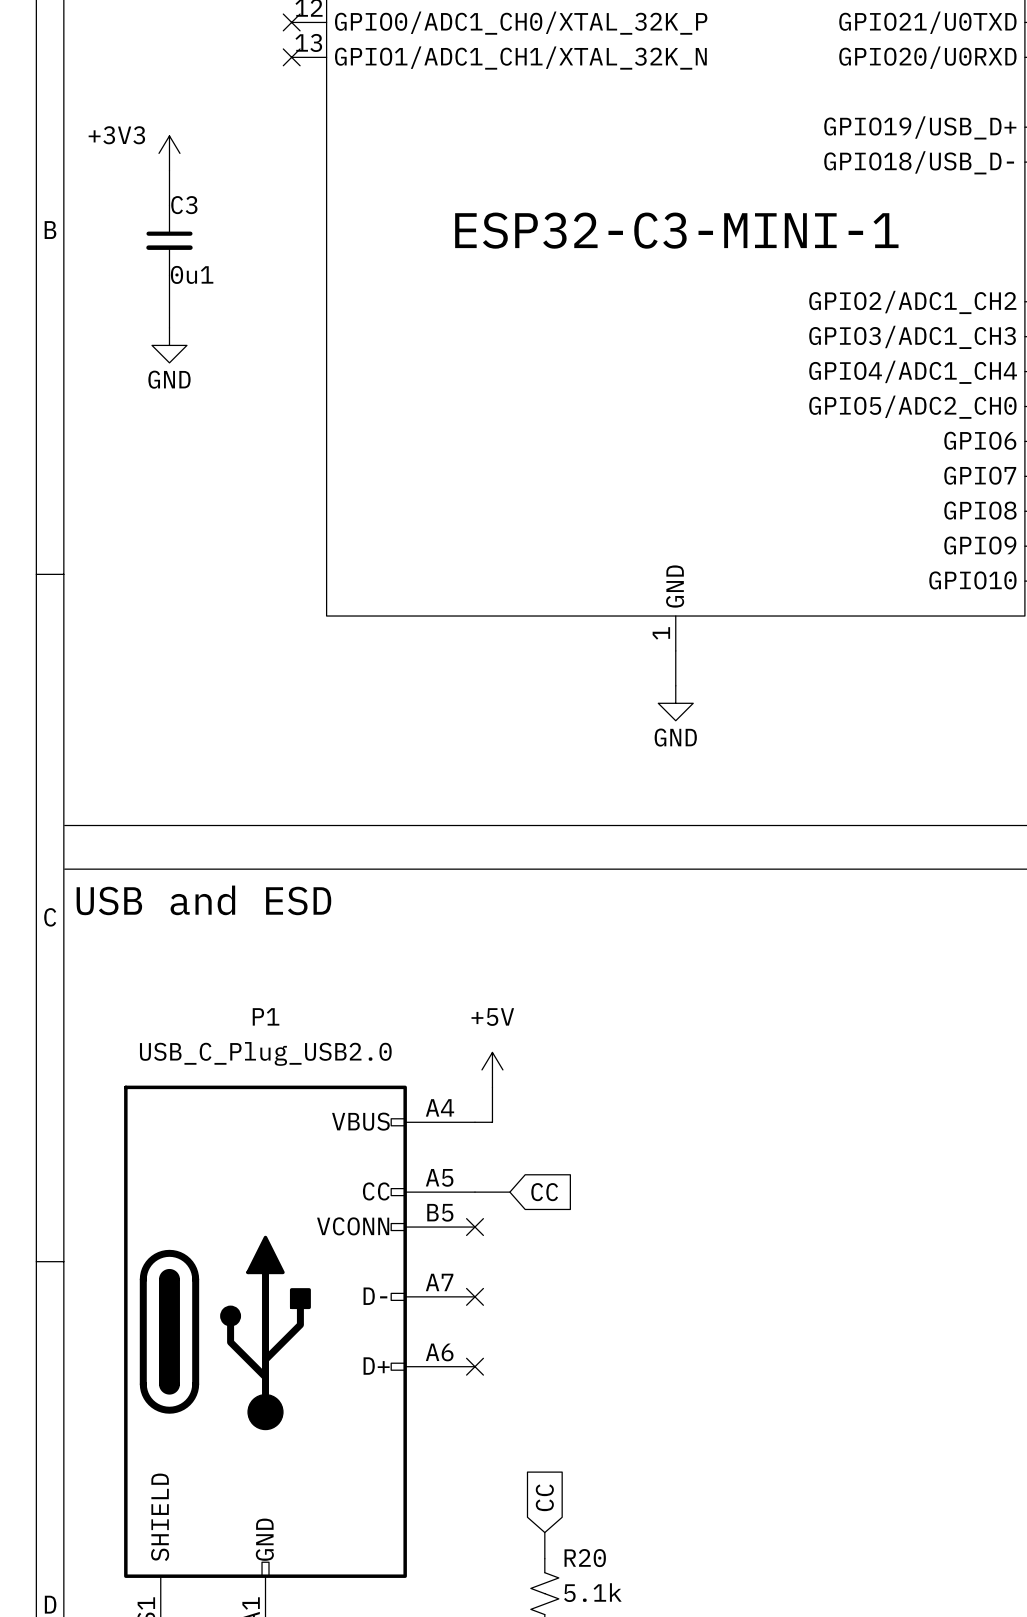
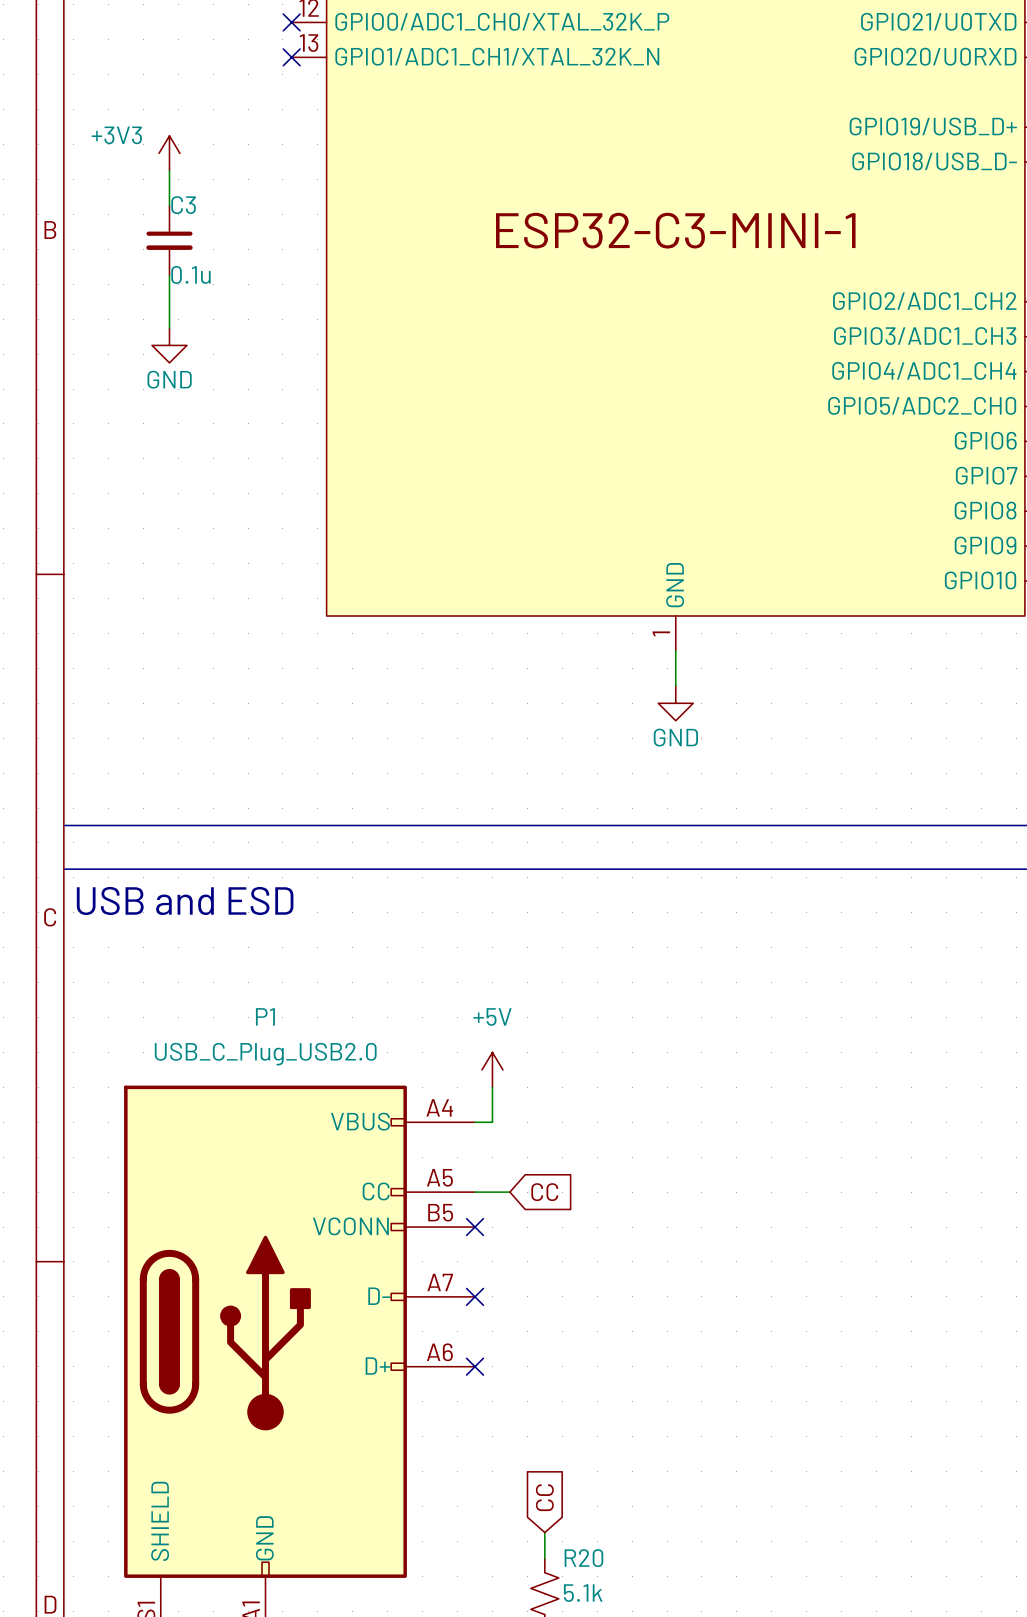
C3 value: 0u1 (192, 274) -> 0.1u (190, 274)

